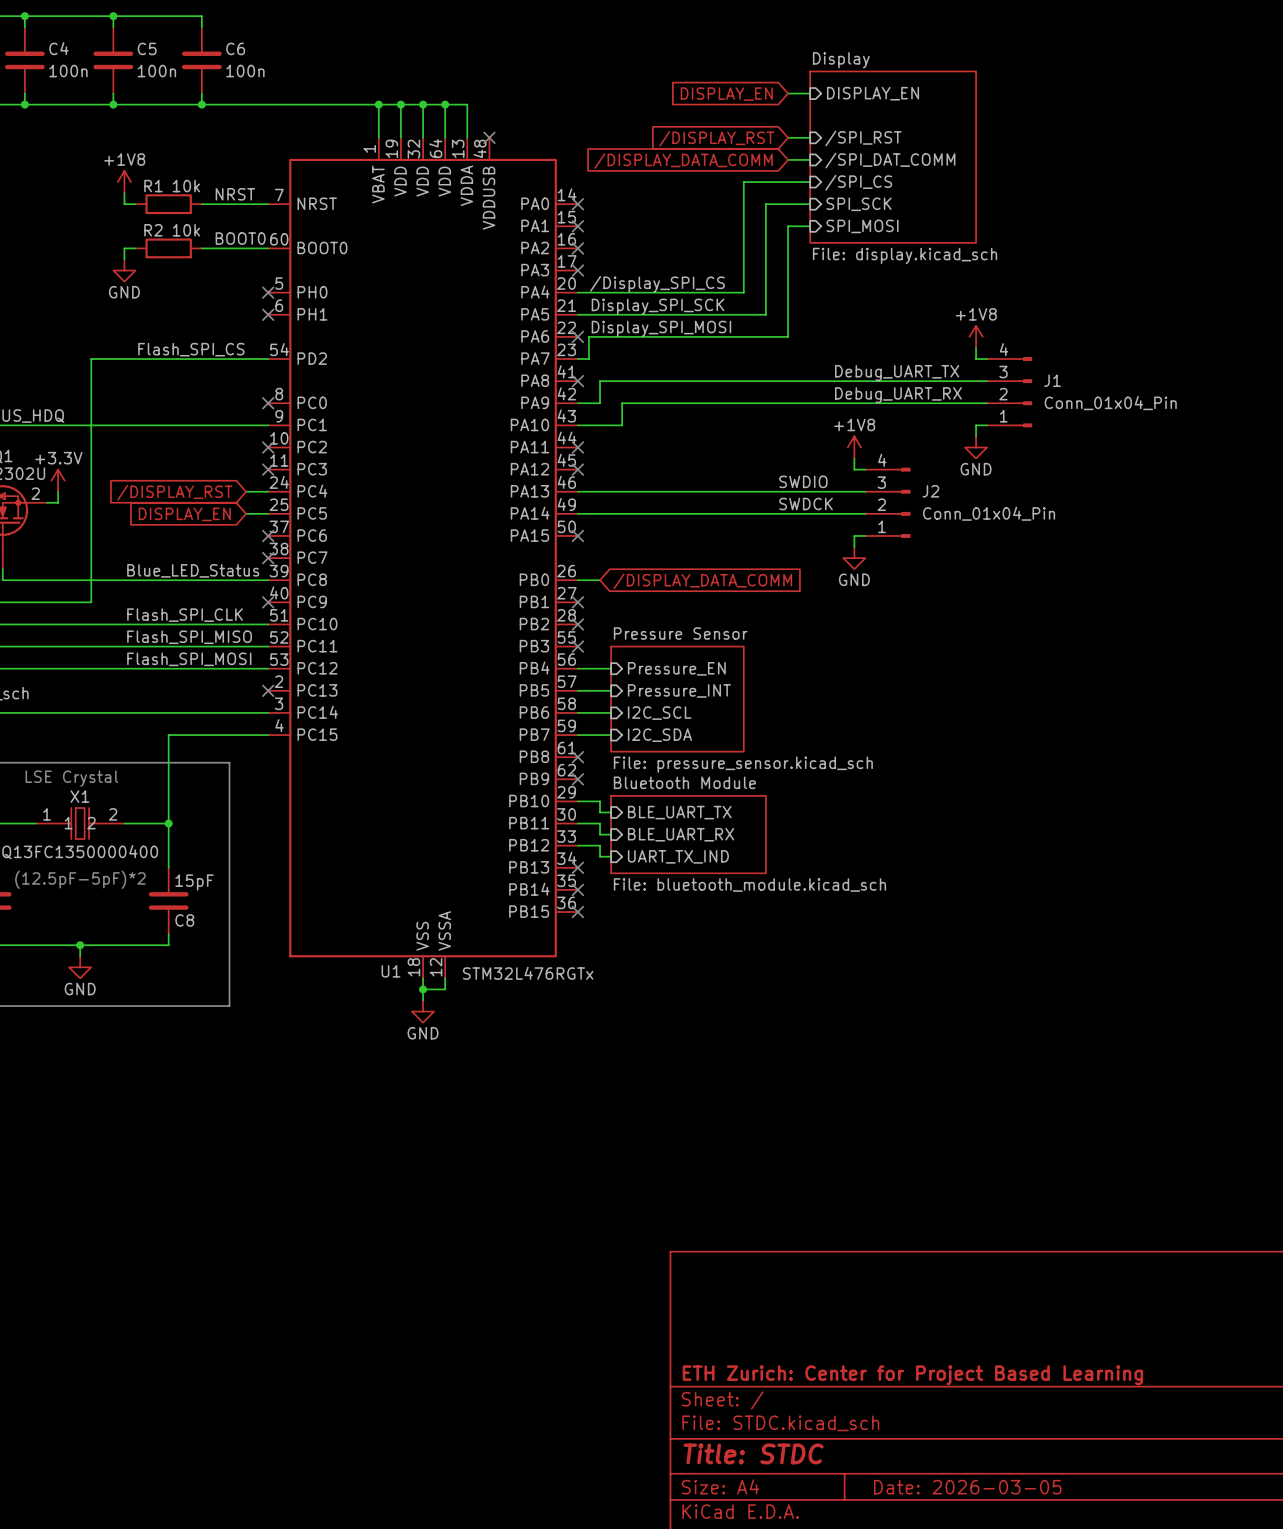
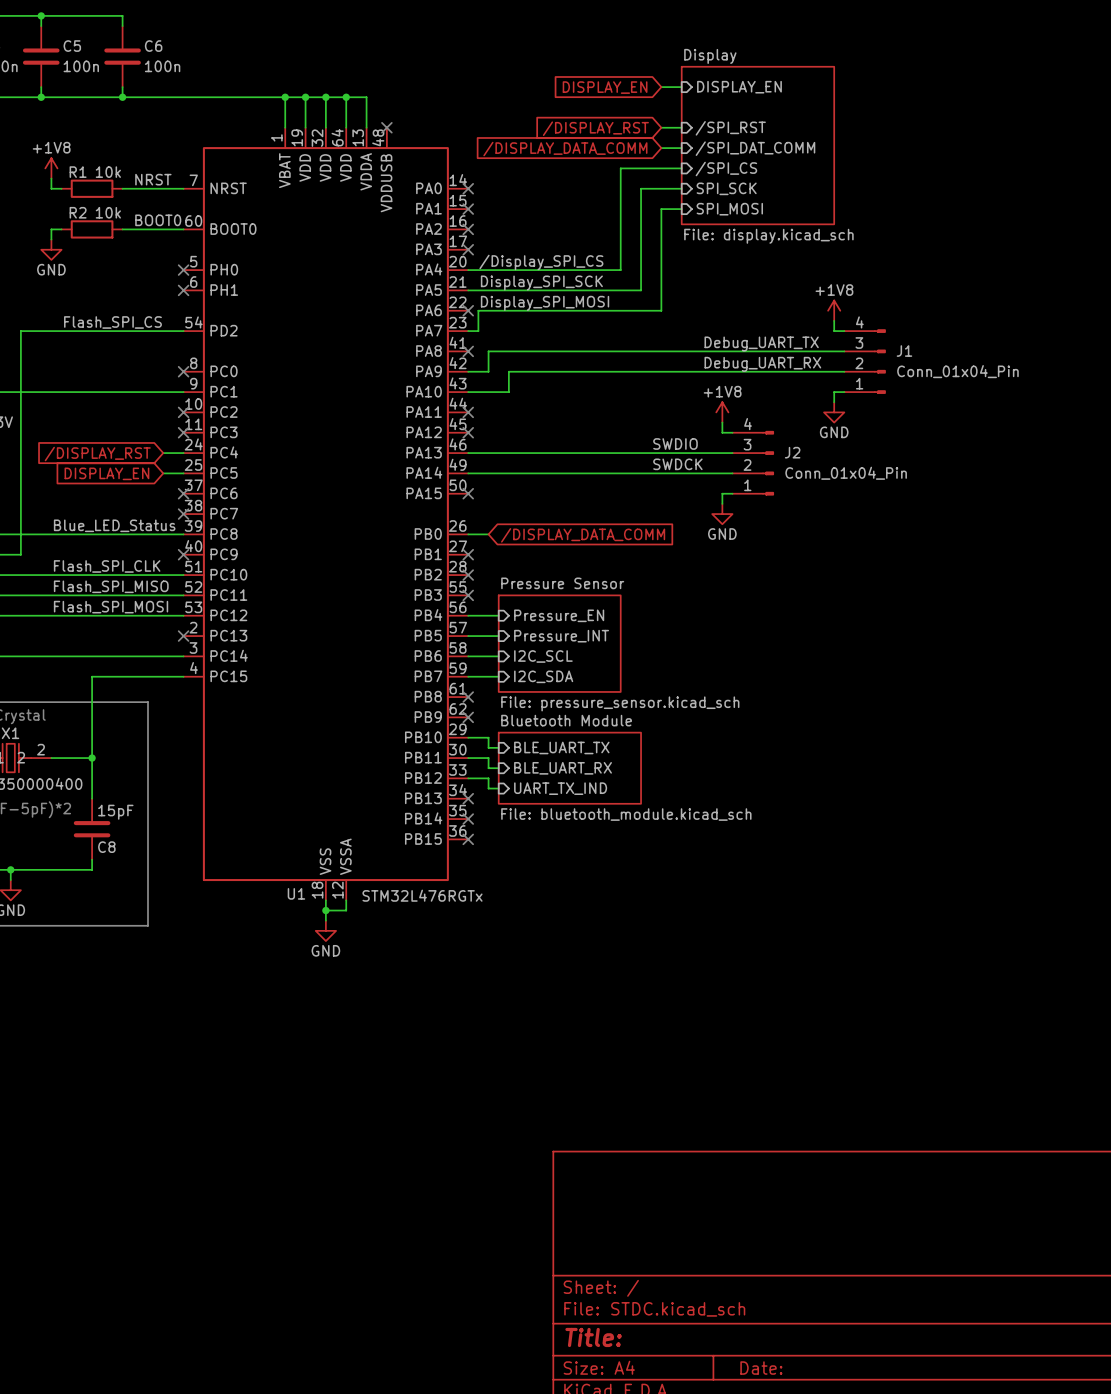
title block: ETH Zurich: Center for Project Based Learning (912, 1375) -> none
title block: Title: STDC (753, 1453) -> Title: (593, 1337)
title block: Date: 2026-03-05 (967, 1487) -> Date: (761, 1368)

